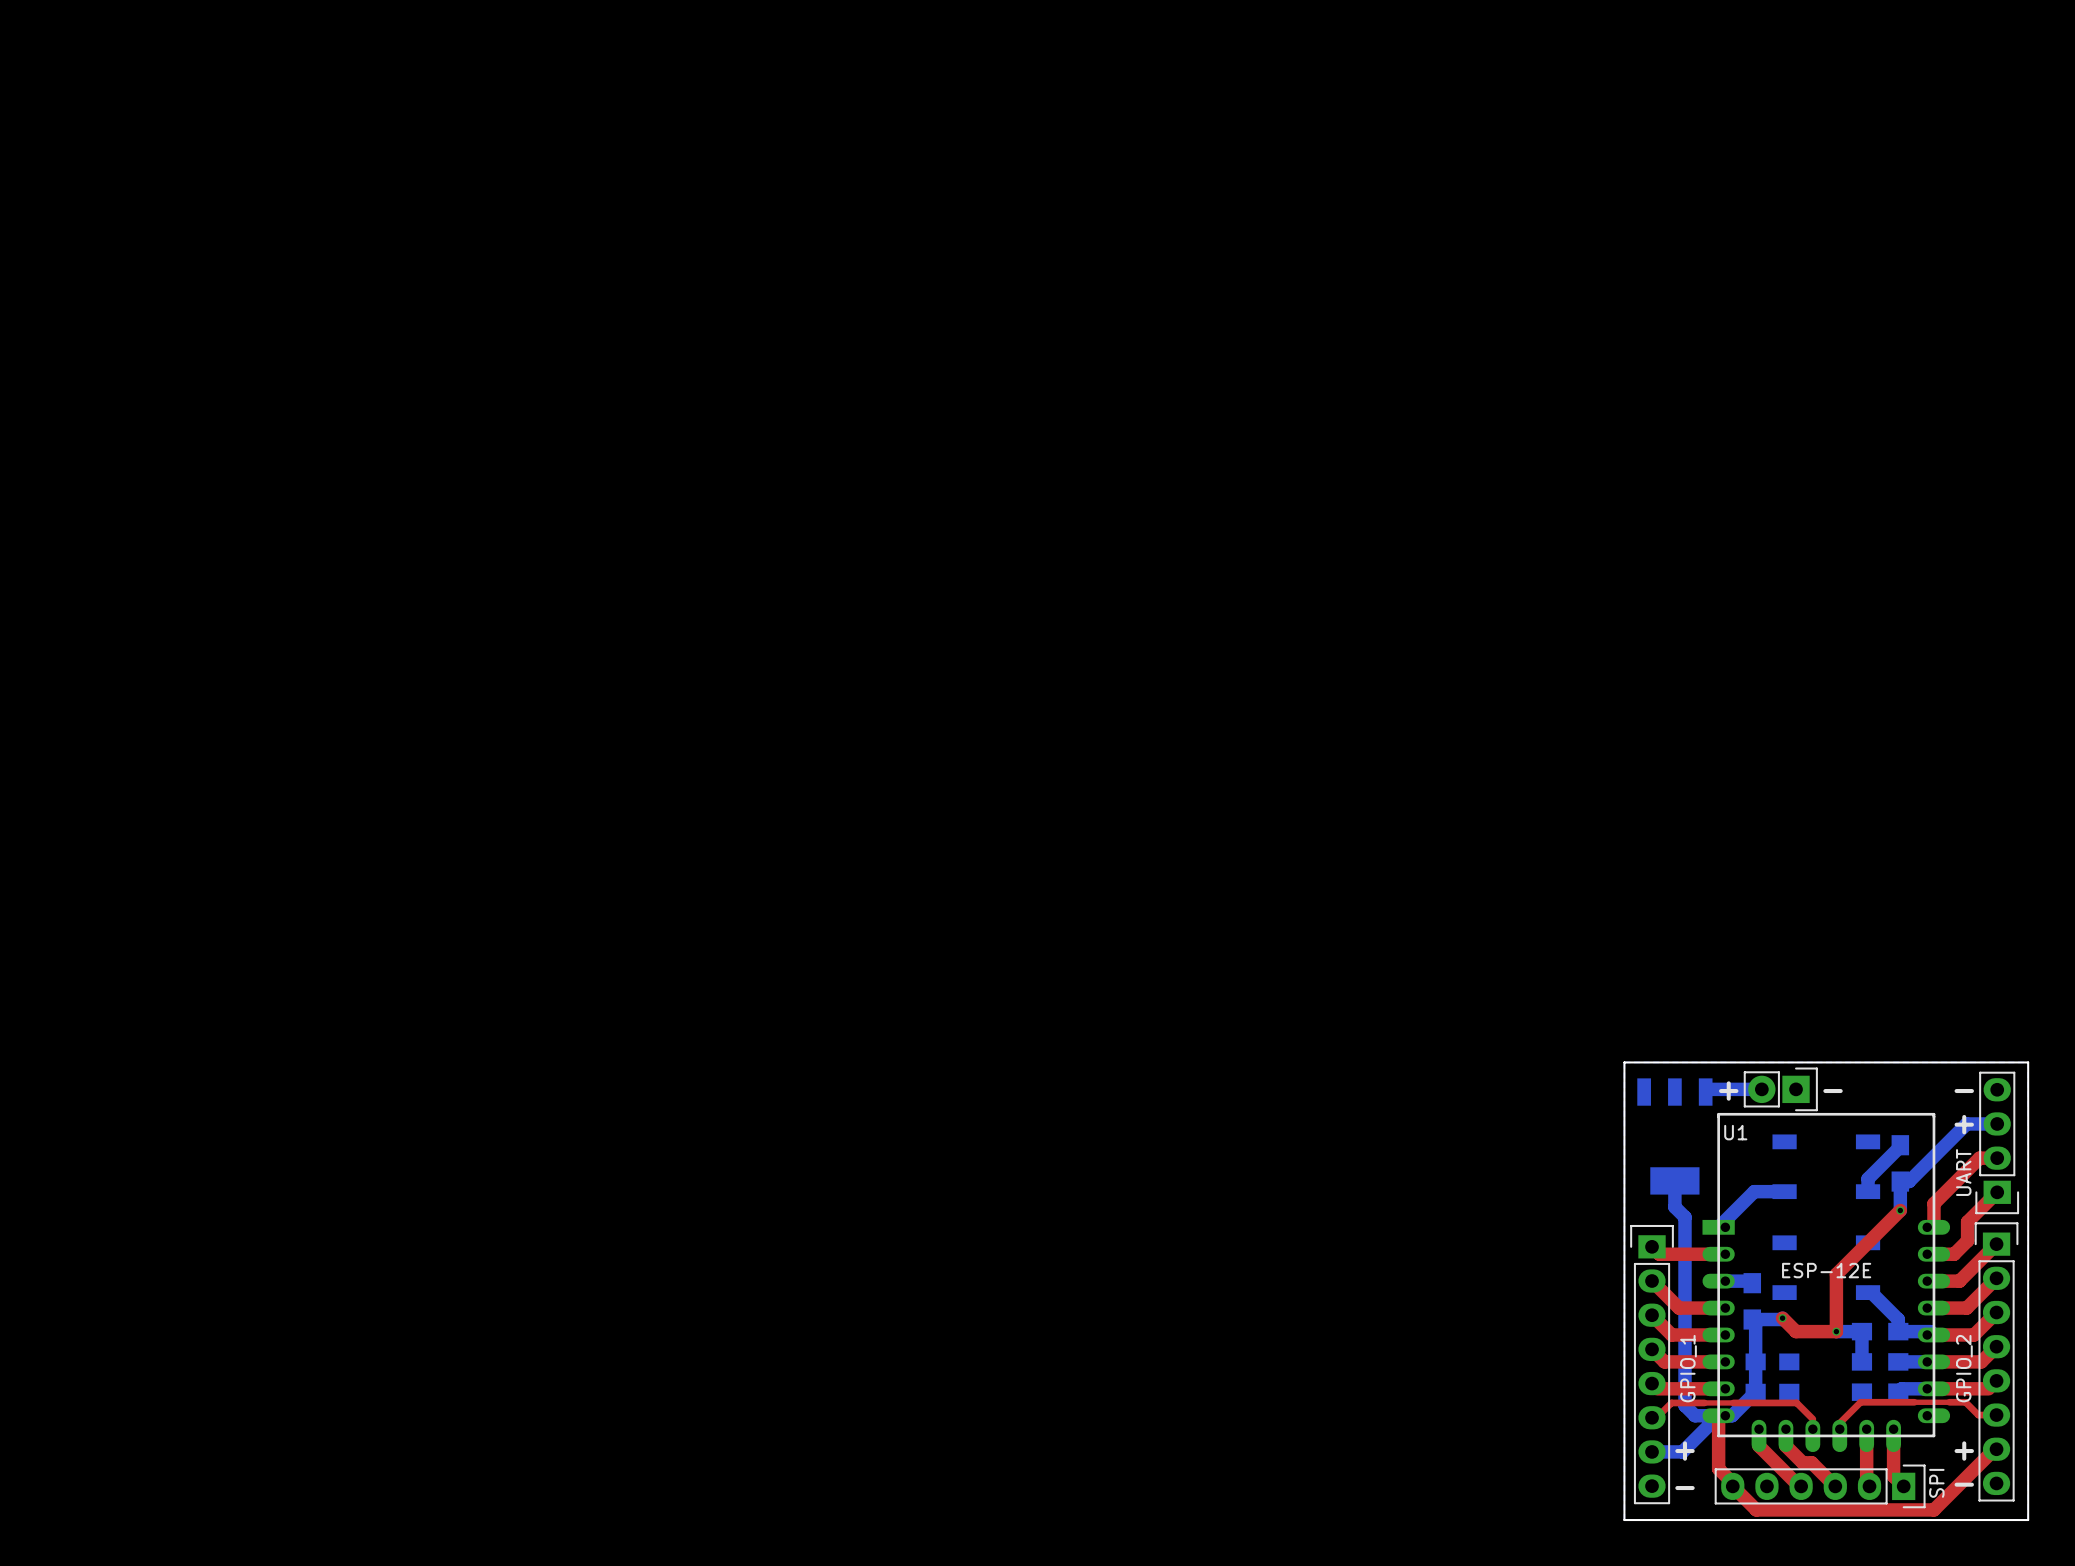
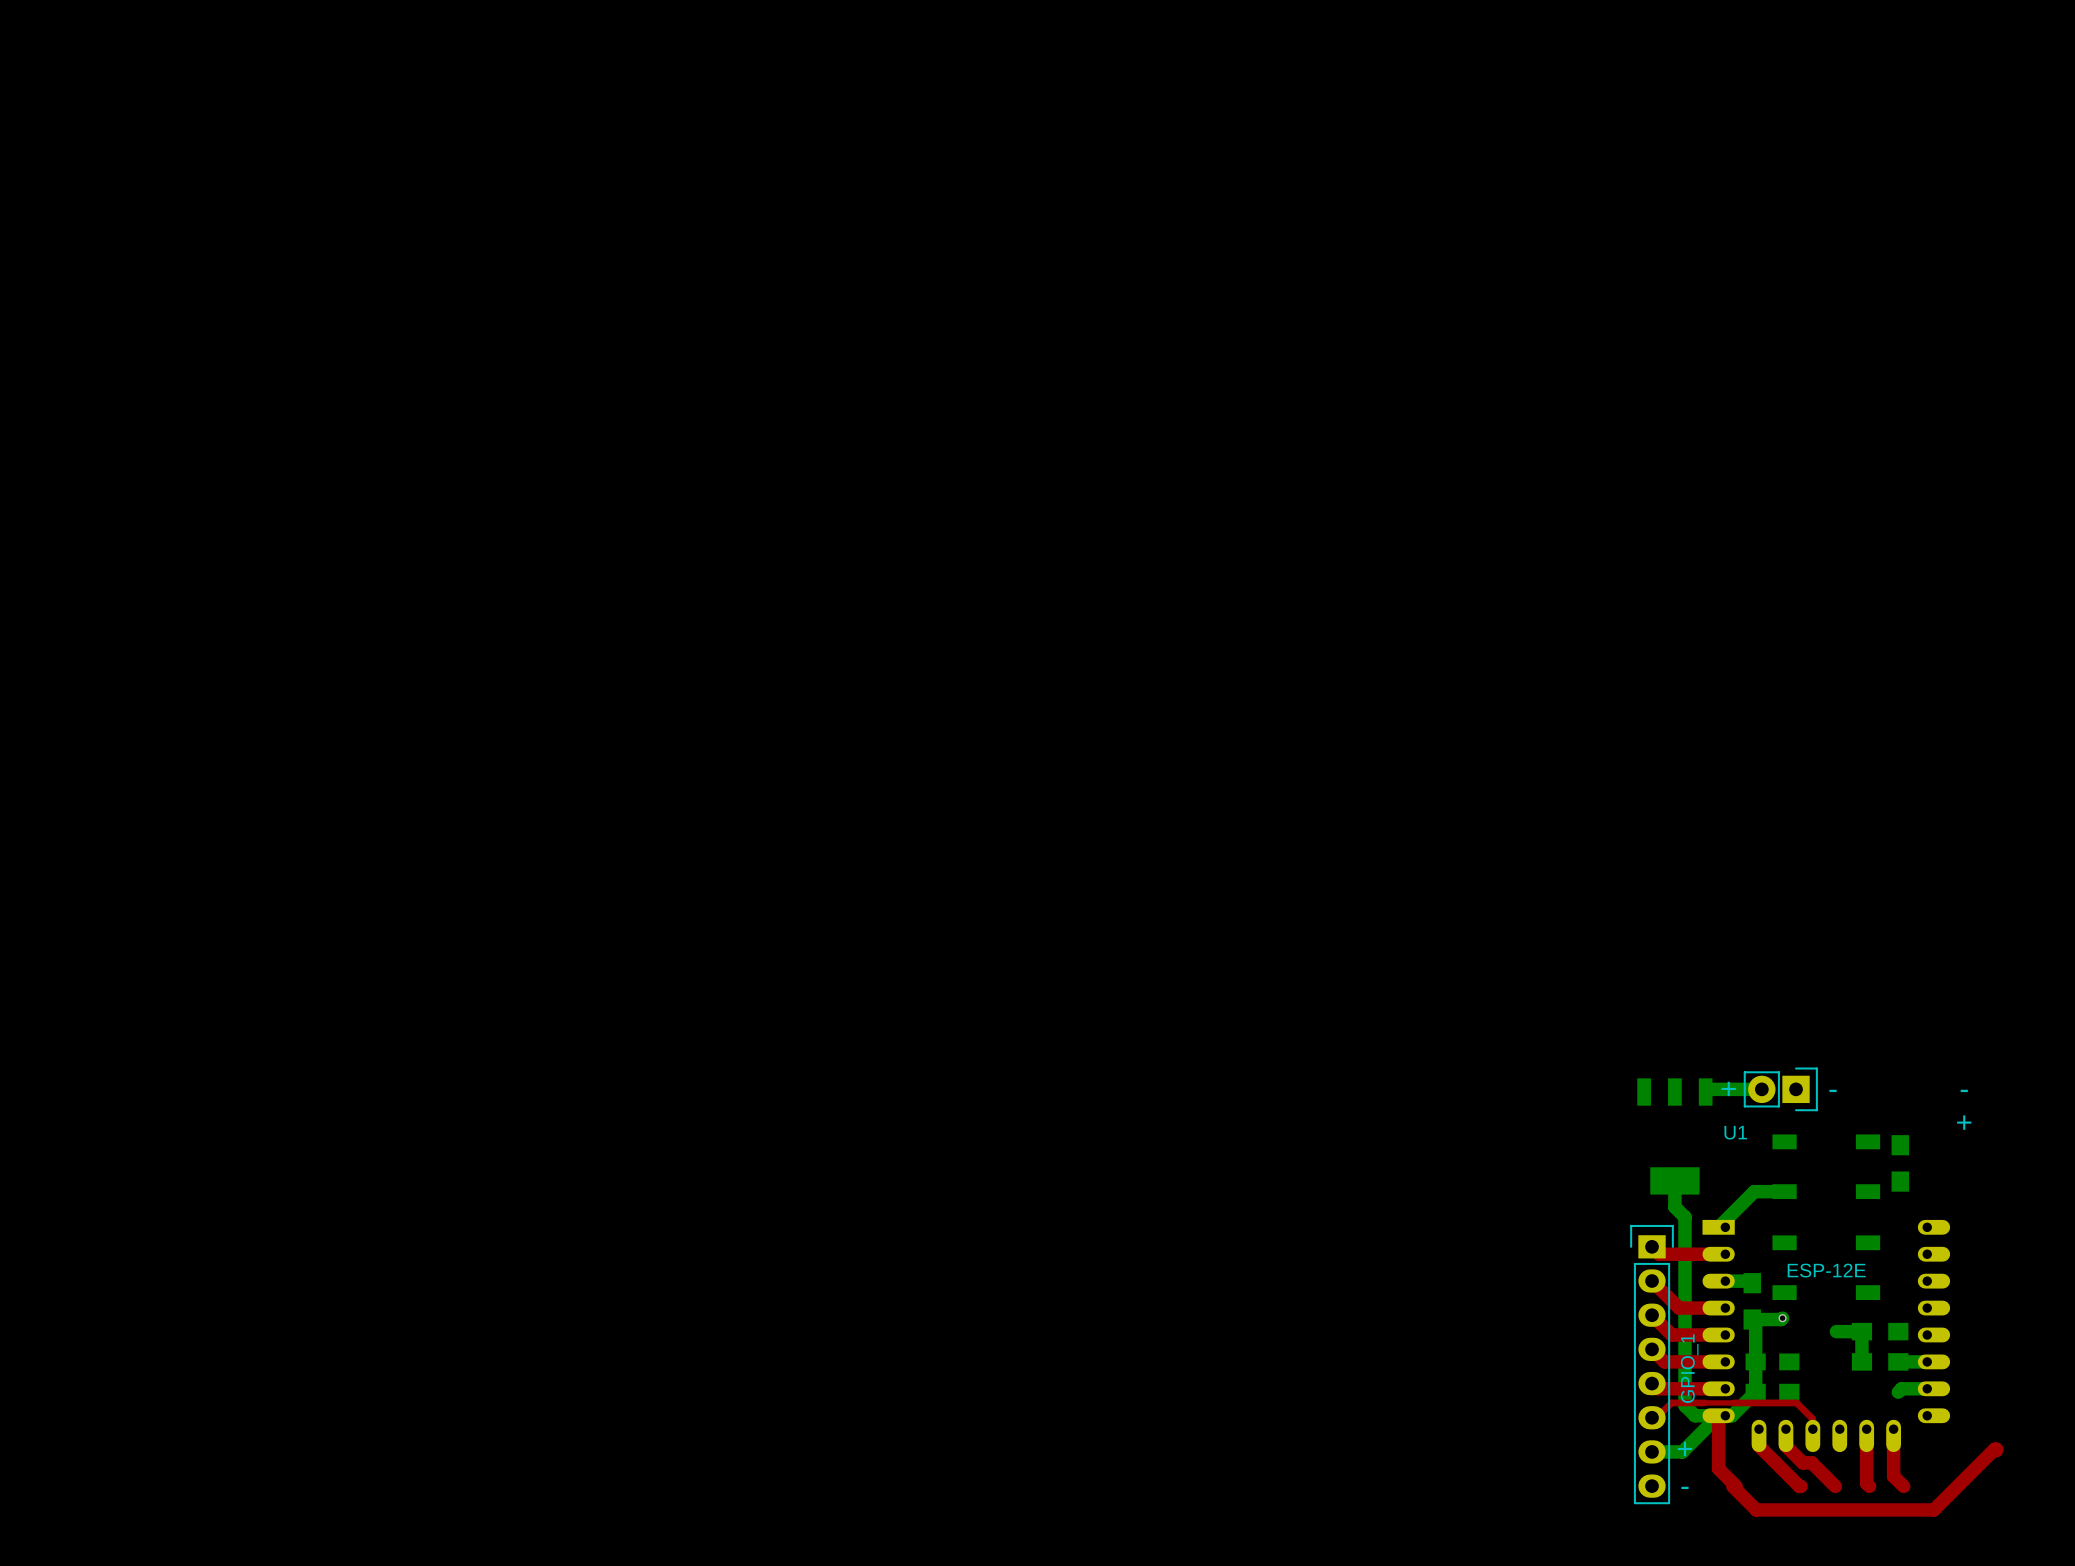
board edge: (1624, 1062) (2028, 1062) (2028, 1520) (1624, 1520) (1624, 1062) -> none
line: (1718, 1114) (1718, 1435) (1933, 1435) (1933, 1114) (1718, 1114) -> none
bottom track: (1997, 1123) (1966, 1123) (1909, 1181) (1900, 1181) (1900, 1210) -> none
part: UART (1997, 1142) -> none
bottom track: (1900, 1145) (1868, 1178) (1868, 1192) -> none
top track: (1997, 1158) (1979, 1158) (1933, 1203) (1933, 1227) -> none
top track: (1997, 1192) (1967, 1221) (1967, 1240) (1954, 1254) (1933, 1254) -> none
top track: (1900, 1210) (1836, 1274) (1836, 1331) (1796, 1331) (1782, 1318) -> none
via: (1900, 1210) -> none
top track: (1996, 1244) (1959, 1281) (1933, 1281) -> none
top track: (1996, 1278) (1966, 1308) (1933, 1308) -> none
bottom track: (1868, 1292) (1871, 1292) (1898, 1319) (1898, 1331) (1930, 1331) (1933, 1334) -> none
top track: (1996, 1312) (1974, 1334) (1933, 1334) -> none
via: (1836, 1331) -> none
top track: (1996, 1346) (1981, 1361) (1933, 1361) -> none
part: GPIO_2 (1996, 1361) -> none
top track: (1933, 1388) (1988, 1388) -> none
part: (1880, 1392) -> none
top track: (1996, 1415) (1978, 1415) (1965, 1402) (1860, 1402) (1839, 1423) (1839, 1435) -> none
text: + (1964, 1451) -> none
text: - (1964, 1484) -> none
part: SPI (1820, 1486) -> none

